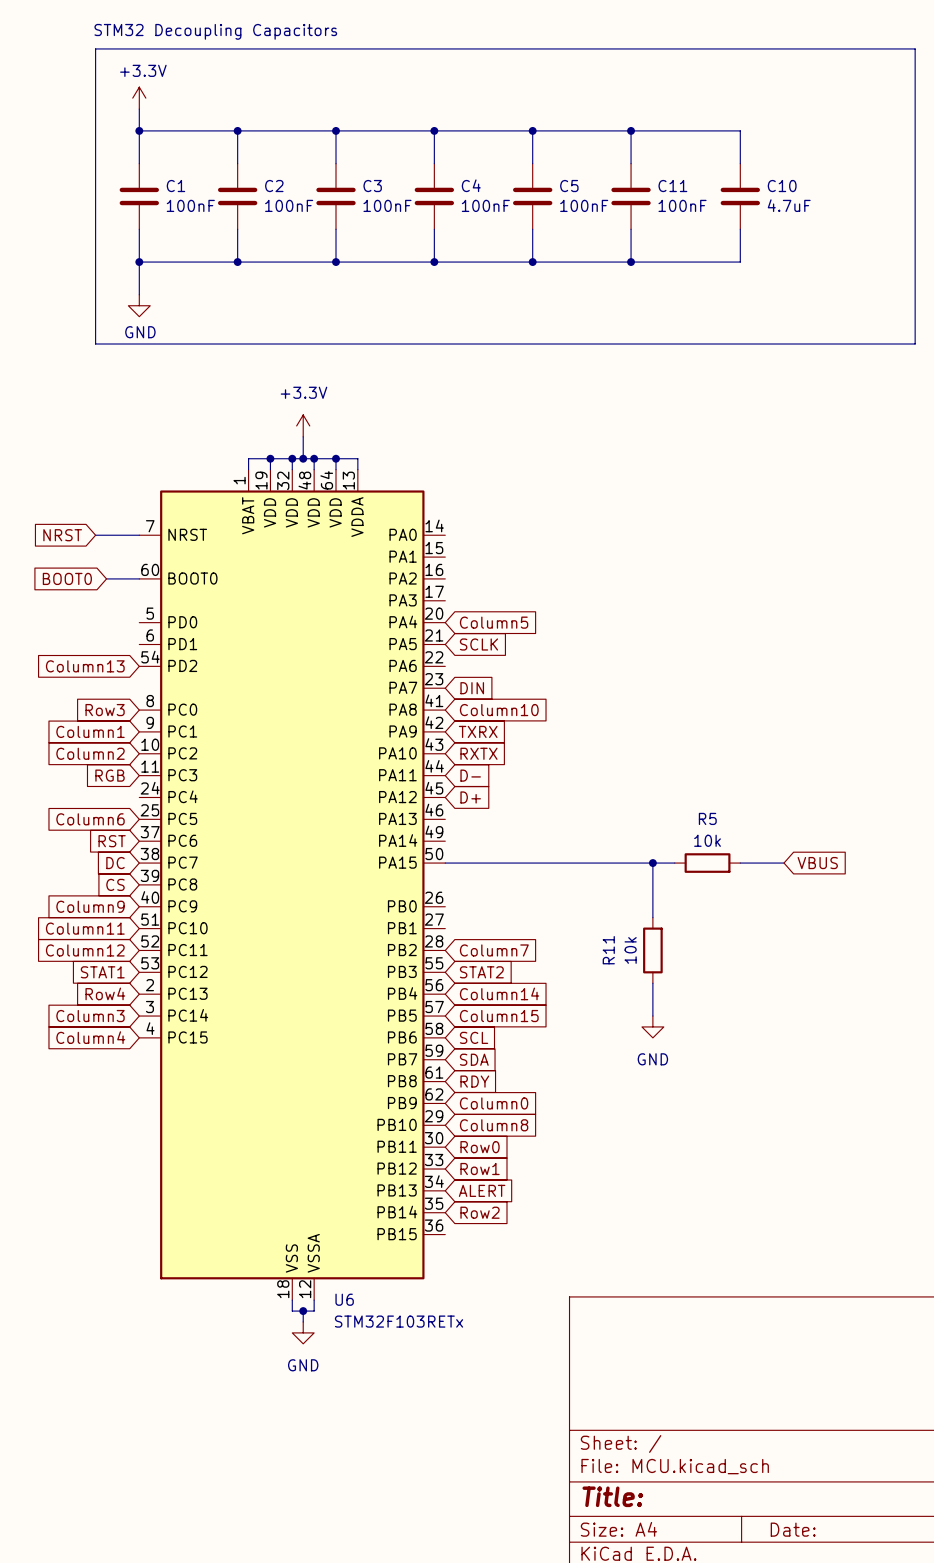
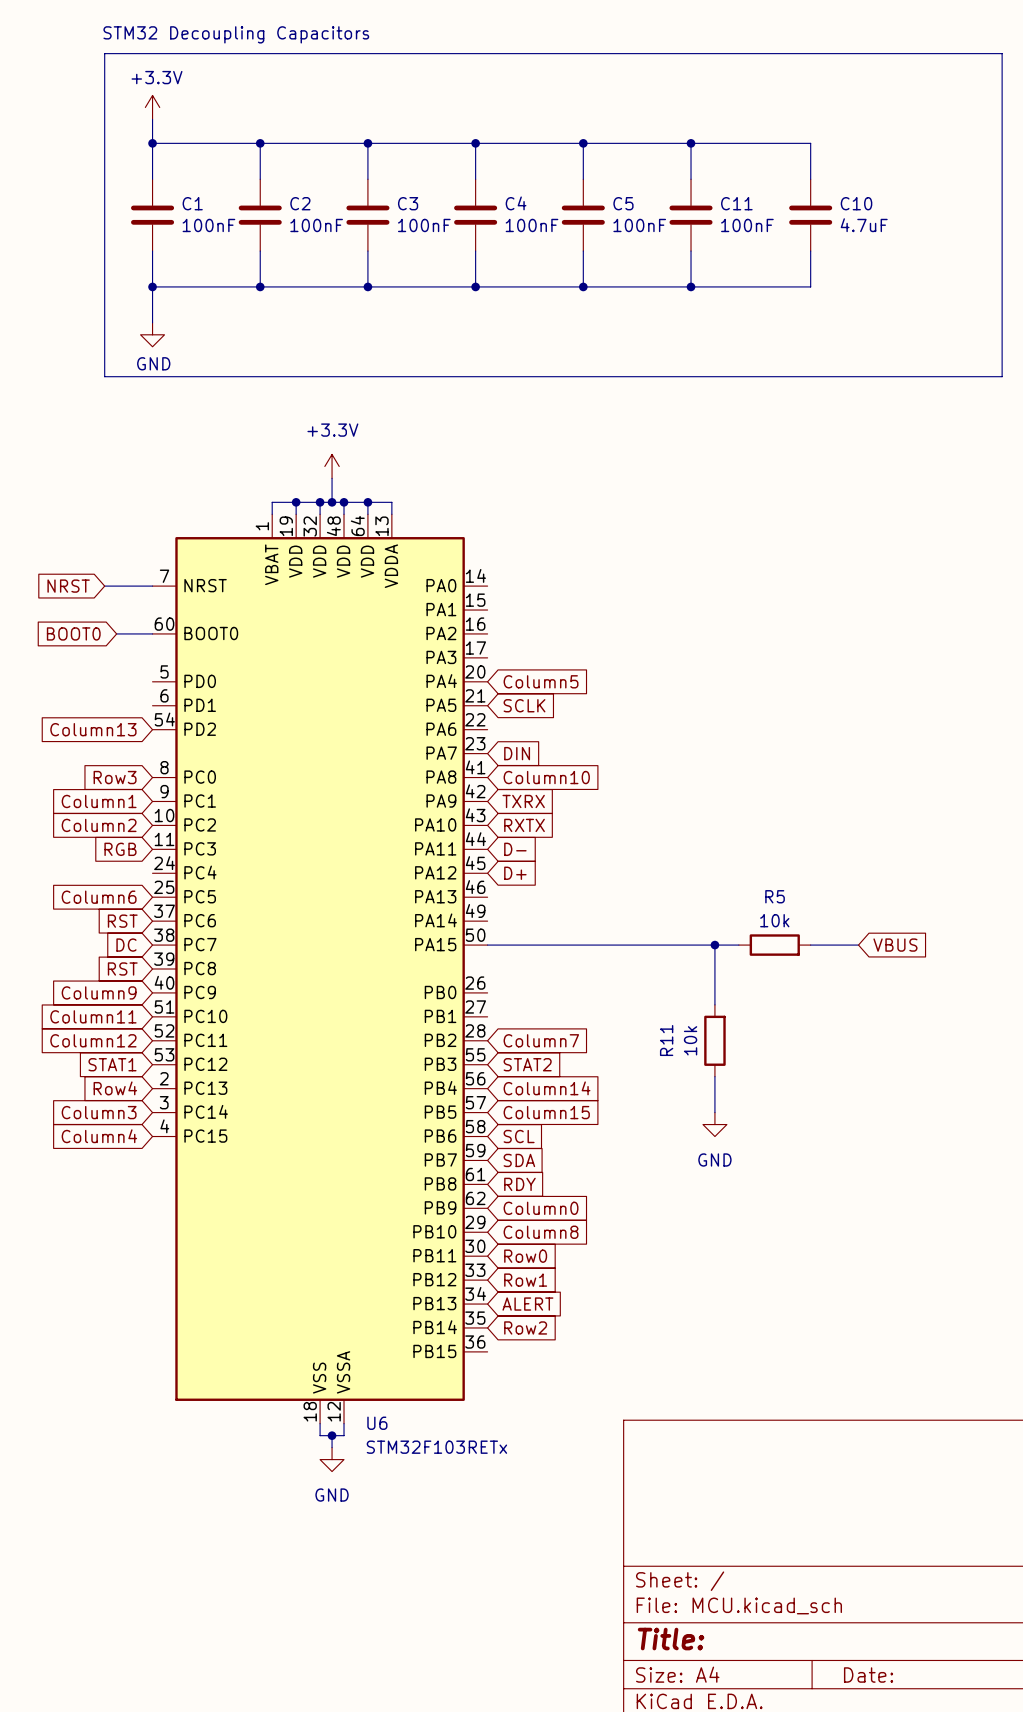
global label: CS (115, 884) -> RST (122, 969)

